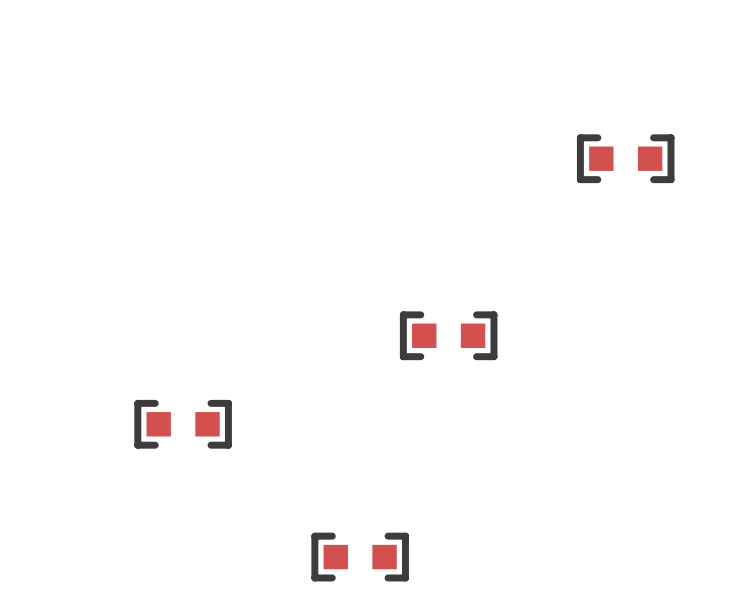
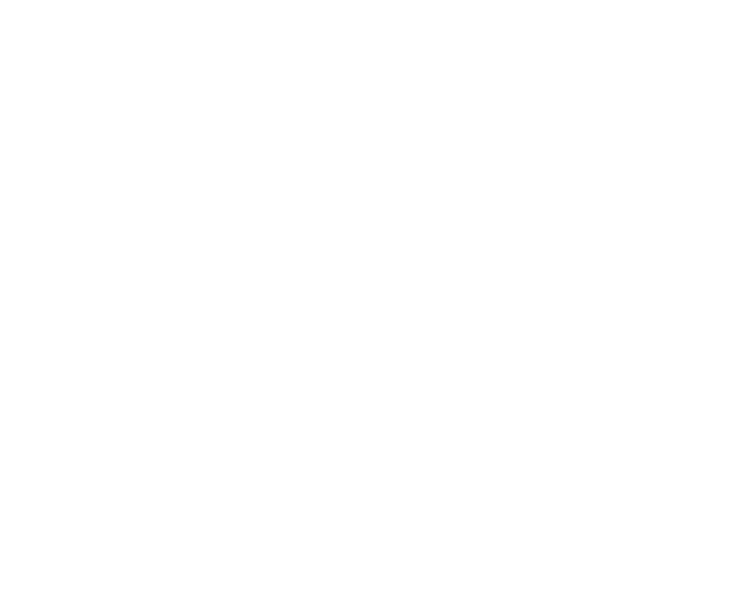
part: (625, 158) -> none
part: (448, 335) -> none
part: (183, 424) -> none
part: (360, 557) -> none

